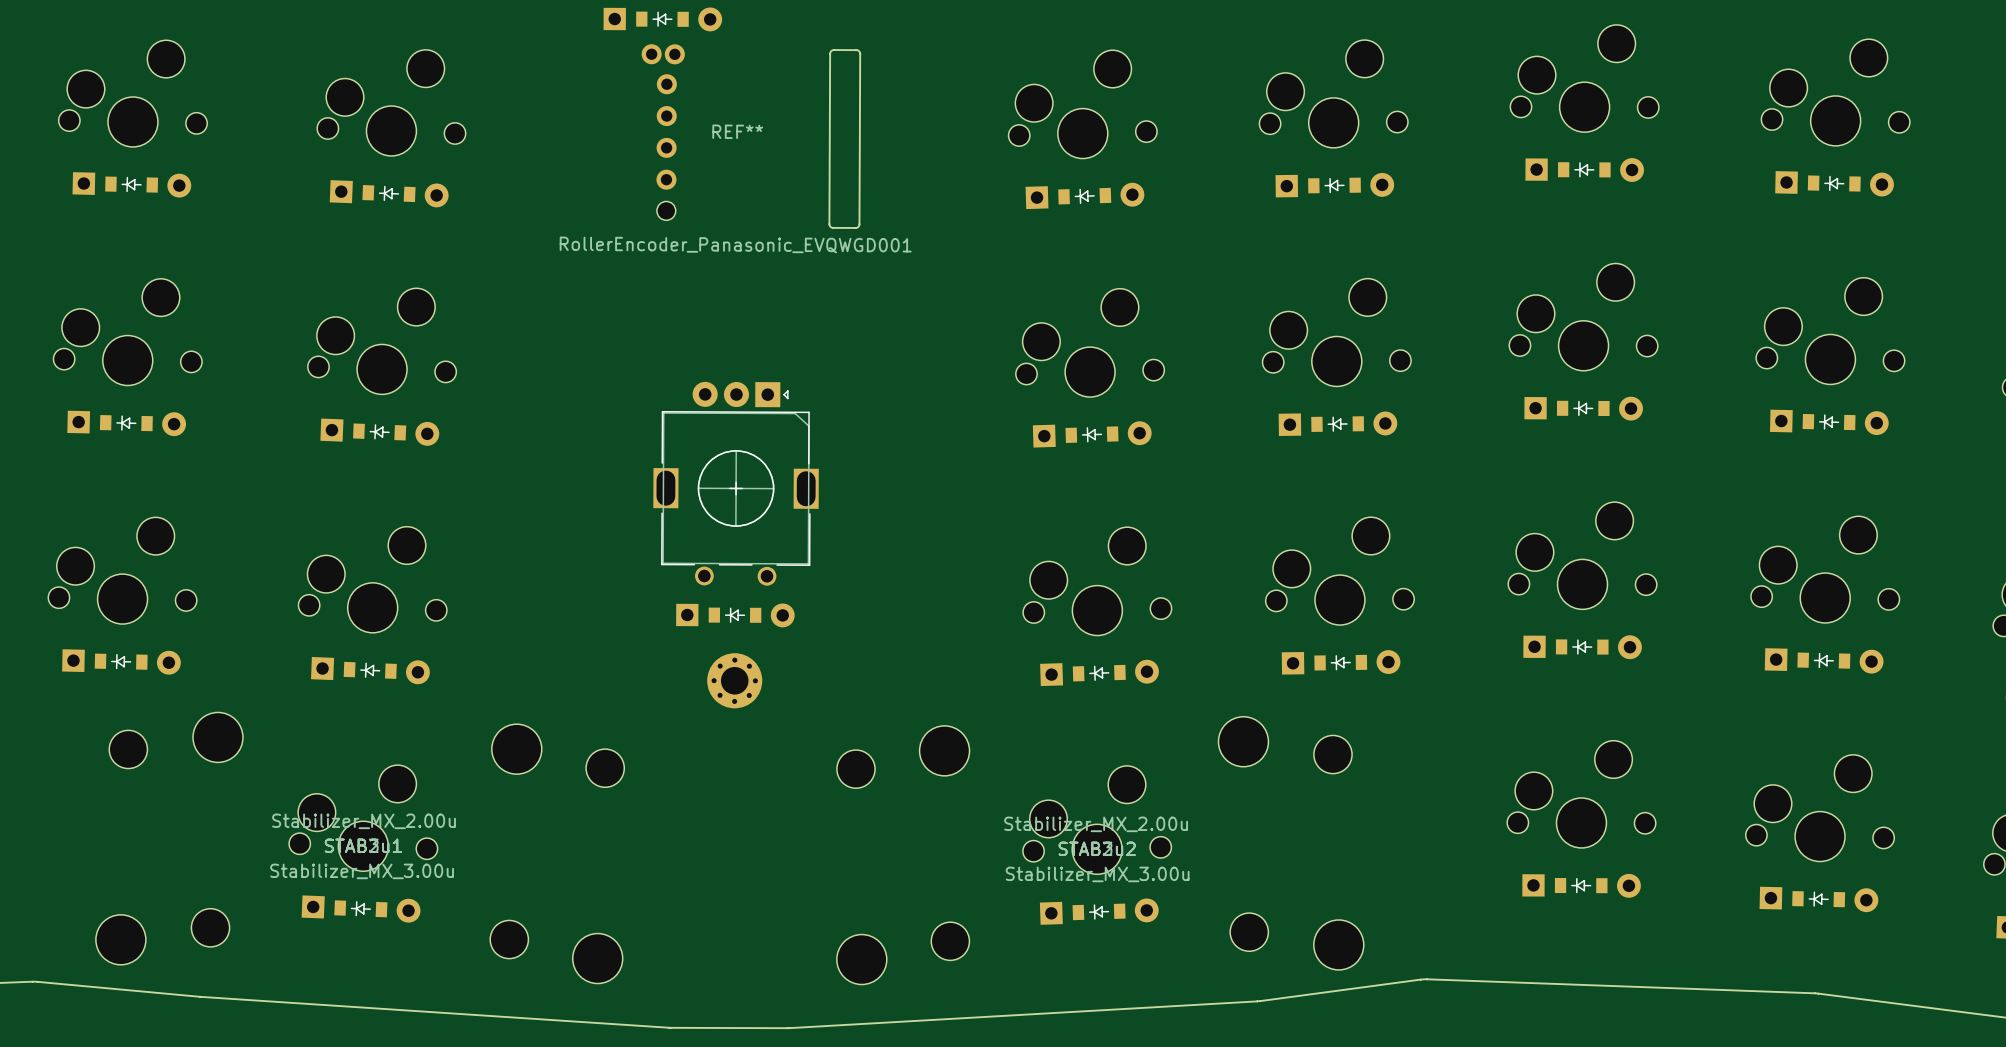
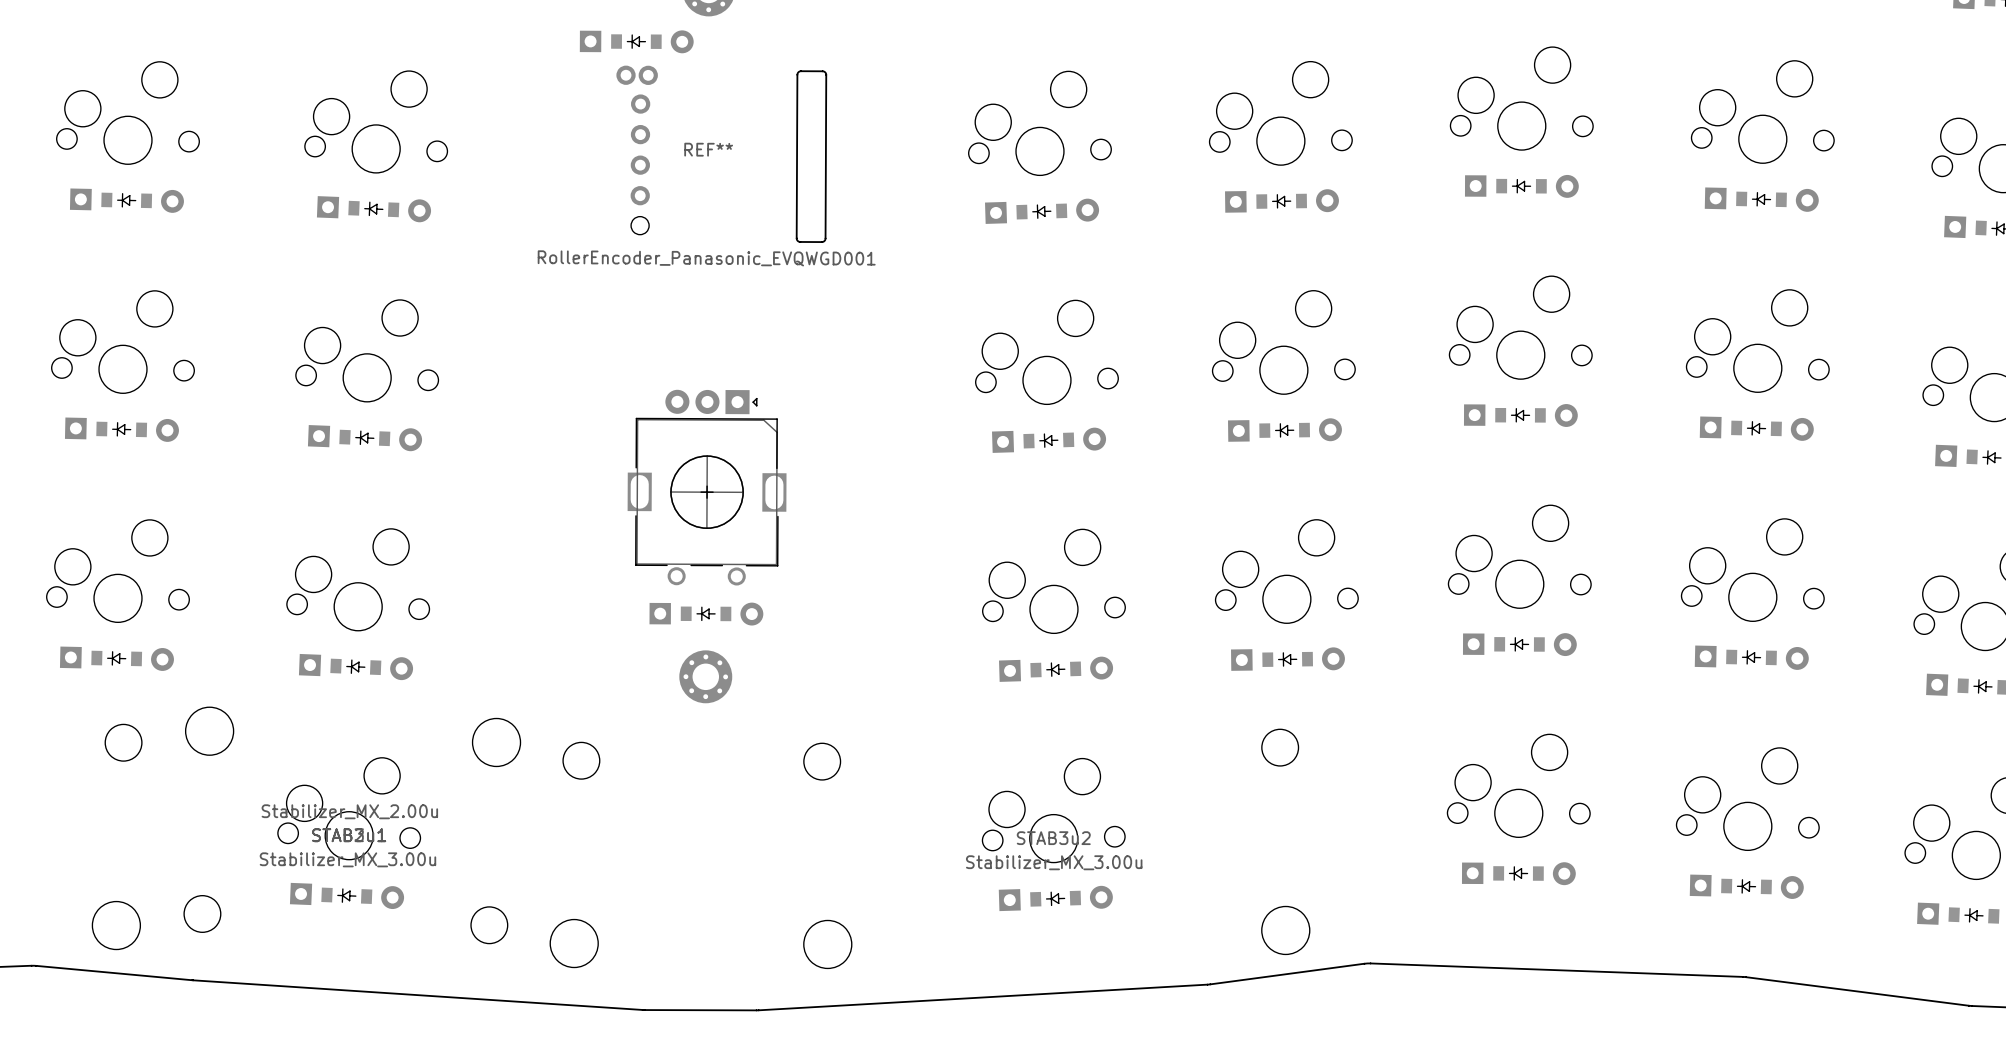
part: Stabilizer_MX_2.00u (1094, 838) -> none

